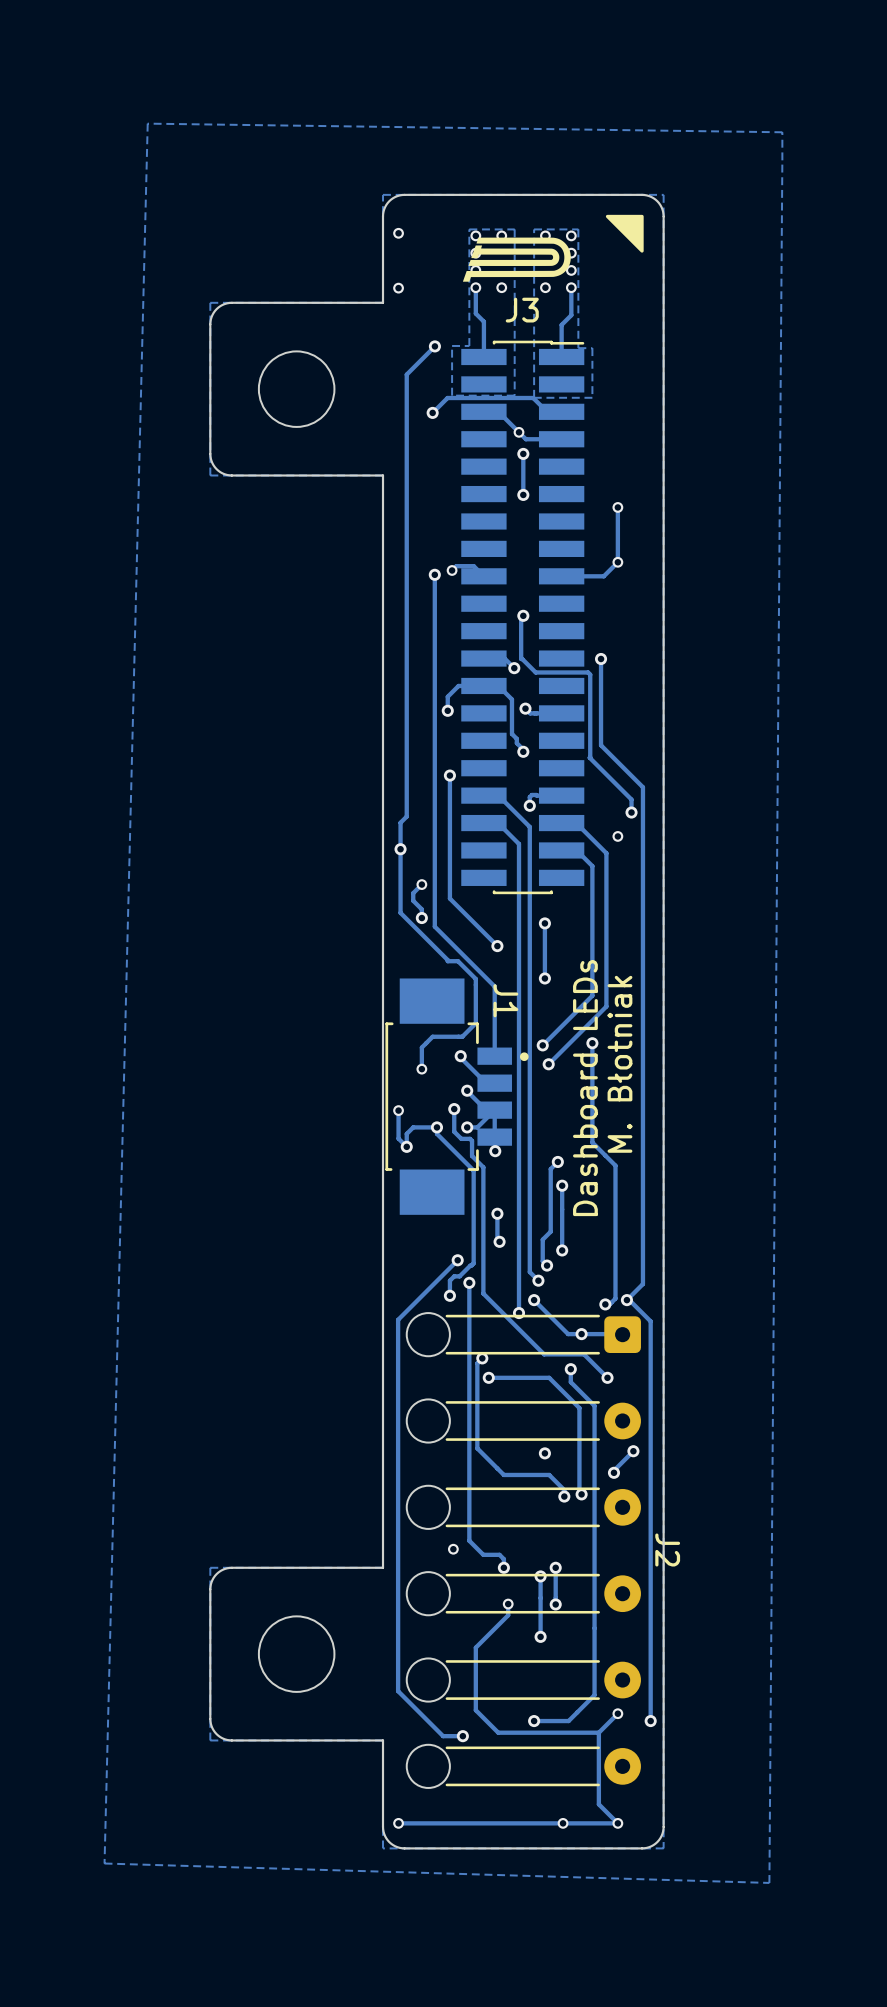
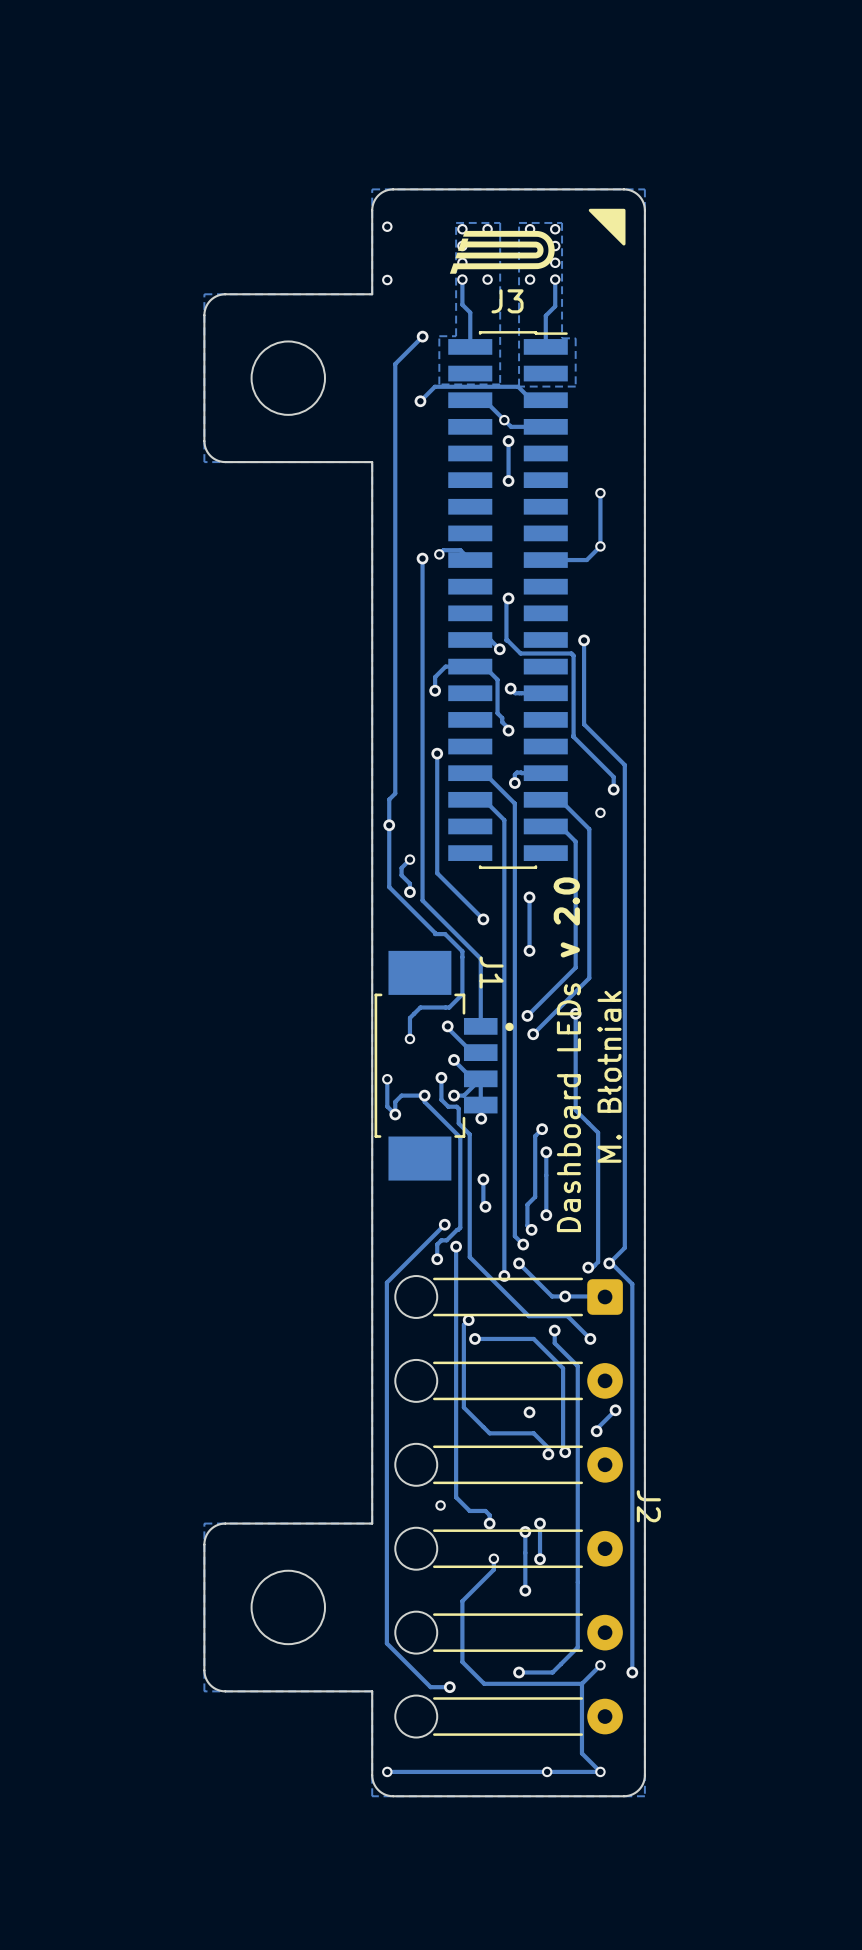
zone outline: (147, 123) (782, 132) (769, 1882) (104, 1863) (147, 123) -> none
text: none -> v 2.0 (566, 917)
text position: M. Błotniak (619, 1064) -> M. Błotniak (609, 1076)
text position: Dashboard LEDs (585, 1088) -> Dashboard LEDs (568, 1107)

